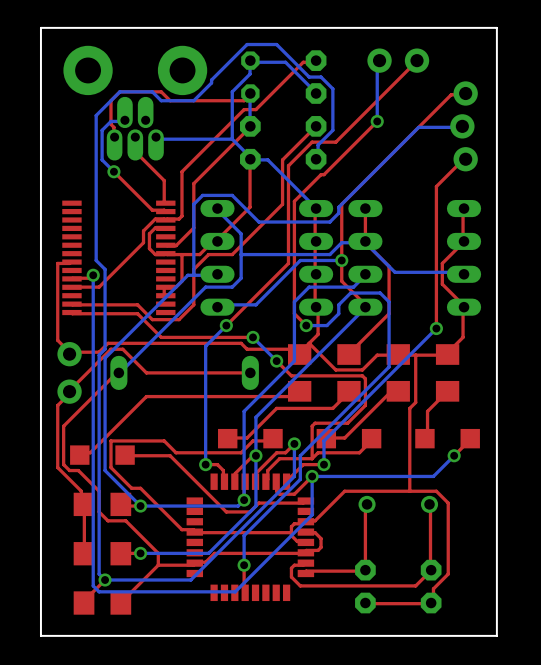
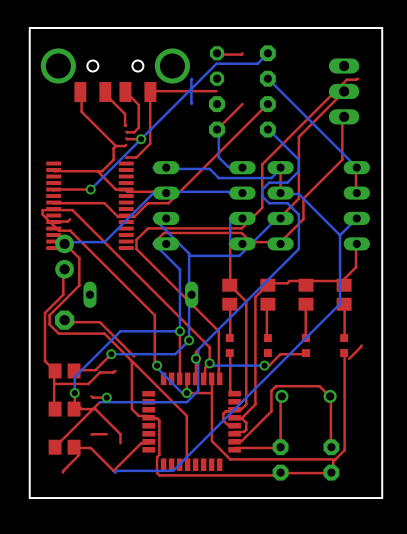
top track: none -> (217, 53) (232, 54)
bottom track: none -> (267, 53) (257, 63) (216, 63) (90, 189)
bottom track: (379, 60) (377, 62) (377, 121) -> none
part: (398, 60) -> none
top track: (417, 60) (335, 142) (312, 142) (288, 165) (288, 263) (226, 325) -> none
top track: (303, 62) (255, 109) -> (216, 91) (195, 91)
part position: (250, 77) -> (217, 66)
part position: (316, 77) -> (267, 66)
part: none -> (115, 75)
top track: (250, 93) (244, 100) (170, 100) (161, 91) (119, 91) (110, 100) (110, 124) (113, 127) (114, 137) -> none
bottom track: (316, 93) (285, 62) (252, 62) (250, 60) (250, 74) (232, 91) (232, 139) -> none
bottom track: none -> (267, 78) (356, 167)
part: (135, 103) -> none
top track: (244, 109) (181, 171) (181, 216) (179, 219) (155, 219) (143, 230) (143, 242) (99, 287) (71, 287) -> (186, 91) (150, 92) (150, 143) (136, 157) (126, 157)
top track: none -> (344, 91) (298, 136) (298, 198) (280, 218)
part: none -> (344, 91)
top track: none -> (80, 92) (81, 111) (115, 146)
top track: none -> (105, 92) (104, 93) (125, 114) (126, 125)
top track: none -> (125, 92) (138, 104) (138, 127) (134, 132) (126, 131)
bottom track: (124, 120) (110, 121) (102, 130) (102, 159) (113, 171) -> none
top track: (377, 121) (294, 201) (294, 313) (306, 325) -> none
via: (377, 121) -> none
top track: (250, 126) (193, 183) (193, 227) (176, 245) (165, 245) -> none
bottom track: (462, 126) (418, 127) (338, 207) (338, 213) (329, 222) -> (280, 167) (271, 178) (253, 178)
part: (464, 126) -> none
top track: (135, 137) (137, 139) (137, 153) (164, 180) (165, 203) -> none
bottom track: (156, 137) (158, 139) (232, 139) -> none
bottom track: (232, 139) (250, 159) (267, 159) (316, 208) -> none
part: (250, 142) -> none
part: none -> (217, 116)
part: (316, 142) -> none
part: none -> (267, 116)
top track: none -> (344, 116) (342, 118) (342, 159) (303, 198) (303, 219) (280, 242) (250, 242) (241, 232) (163, 232) (153, 243)
top track: (250, 159) (250, 207) (217, 239) (217, 242) (211, 242) (199, 254) -> none
top track: (283, 159) (282, 204) (232, 254) (220, 254) -> (267, 104) (168, 203)
bottom track: none -> (217, 129) (218, 130) (218, 157) (229, 167)
bottom track: (316, 159) (318, 156) (318, 145) (332, 130) (332, 88) (321, 77) (309, 77) (276, 44) (247, 44) (193, 100) (161, 100) (152, 91) (119, 91) (96, 115) (96, 260) (105, 269) (105, 349) (99, 355) (99, 479) -> (153, 243) (179, 269) (179, 331) (120, 331) (74, 377)
top track: (465, 159) (436, 186) (436, 328) -> none
top track: none -> (126, 138) (141, 139)
top track: (113, 171) (152, 210) (165, 211) -> none
via: (113, 171) -> none
via: none -> (141, 139)
top track: none -> (126, 144) (115, 146)
top track: none -> (115, 146) (113, 148) (113, 159) (102, 171) (53, 170)
bottom track: (217, 208) (241, 233) (241, 278) (232, 287) (205, 287) (118, 372) -> none
top track: (316, 208) (315, 304) (318, 307) (318, 334) (299, 354) (294, 349) (247, 349) (241, 343) (108, 343) (99, 352) (69, 352) -> none
top track: none -> (97, 171) (115, 189) (153, 193)
bottom track: (285, 222) (258, 222) (232, 195) (202, 195) (193, 204) (193, 275) -> (218, 178) (209, 168) (153, 167)
top track: (165, 228) (155, 227) (149, 233) (149, 248) (155, 254) (193, 254) -> (53, 203) (104, 203) (118, 216) (134, 216) (147, 203)
top track: none -> (90, 189) (53, 190)
via: none -> (90, 189)
bottom track: none -> (229, 193) (154, 191) (104, 242) (65, 242) (64, 243)
top track: (365, 241) (389, 266) (389, 313) (348, 354) -> none
top track: (464, 241) (442, 263) (442, 284) (464, 307) -> none
bottom track: none -> (280, 194) (298, 194) (340, 235)
top track: (181, 254) (181, 281) (176, 287) (164, 287) (164, 295) (165, 295) -> none
top track: (208, 254) (193, 269) (193, 304) (179, 319) (152, 319) -> (159, 203) (152, 203)
bottom track: (241, 254) (329, 254) (341, 242) (365, 242) (394, 272) (463, 272) (464, 274) -> (340, 235) (356, 218)
top track: (341, 260) (341, 281) (365, 304) -> (262, 207) (241, 228) (147, 228) (136, 239) (136, 248) (218, 331) (219, 378)
bottom track: (341, 260) (300, 260) (255, 304) (217, 304) (217, 307) -> none
via: (341, 260) -> none
top track: (57, 269) (57, 340) (69, 352) -> (42, 214) (58, 230) (70, 230) (154, 315) (154, 365)
bottom track: none -> (153, 218) (189, 253) (189, 340) (175, 354) (111, 354)
bottom track: (217, 274) (187, 275) (105, 358) (105, 470) (140, 506) (238, 506) (244, 500) (244, 411) (294, 361) (294, 301) (309, 287) (353, 287) (365, 275) -> (189, 255) (239, 255) (276, 219) (280, 219)
bottom track: none -> (229, 218) (229, 243)
bottom track: (93, 275) (93, 585) (99, 591) (235, 591) -> (115, 472) (115, 470) (173, 470) (179, 463)
via: (93, 275) -> none
bottom track: (389, 301) (380, 293) (350, 293) (338, 304) (338, 313) (326, 325) (306, 325) -> (298, 239) (298, 214) (287, 203) (269, 203) (262, 196) (262, 189) (269, 182) (287, 182) (298, 171) (298, 159) (267, 129)
top track: (71, 304) (137, 304) -> (53, 209) (72, 210) (104, 242)
top track: none -> (229, 243) (229, 285) (246, 301) (246, 404)
bottom track: (365, 307) (255, 417) (255, 506) (208, 553) (140, 553) -> none
top track: (71, 312) (137, 313) (161, 337) (252, 337) -> none
bottom track: (389, 313) (389, 366) (300, 455) (300, 479) (244, 535) (244, 565) -> (298, 248) (198, 349) (198, 390) (186, 402) (99, 402)
part: none -> (64, 256)
bottom track: (226, 325) (205, 346) (205, 464) -> none
via: (226, 325) -> none
via: (306, 325) -> none
bottom track: (436, 328) (323, 440) (323, 464) -> none
via: (436, 328) -> none
bottom track: (252, 337) (276, 361) -> none
via: (252, 337) -> none
top track: none -> (64, 269) (63, 294) (45, 313) (45, 361) (55, 370) (55, 409)
top track: (309, 343) (335, 369) (362, 369) (374, 358) -> (241, 418) (255, 404) (255, 297) (269, 283) (287, 283)
part footprint: [288, 344, 312, 402] -> [222, 278, 238, 311]
part footprint: [337, 344, 361, 402] -> [260, 278, 276, 311]
part footprint: [386, 344, 410, 402] -> [298, 278, 314, 311]
part footprint: [435, 344, 460, 402] -> [336, 278, 352, 311]
top track: (415, 355) (415, 402) (409, 408) (409, 491) -> none
top track: (276, 361) (291, 375) (362, 375) (365, 378) (365, 405) (347, 423) (315, 423) (312, 426) (312, 458) -> none
via: (276, 361) -> none
part: (69, 372) -> none
top track: (118, 372) (63, 426) (63, 464) (69, 470) (78, 470) (99, 491) (99, 500) -> none
top track: (250, 372) (146, 372) (122, 349) (110, 349) (69, 390) (69, 393) (57, 405) (57, 467) (81, 491) (81, 503) (84, 506) (84, 553) -> none
top track: none -> (229, 304) (229, 338)
top track: none -> (267, 304) (267, 338)
top track: none -> (305, 304) (305, 338)
top track: none -> (344, 304) (344, 338)
top track: (299, 391) (294, 396) (146, 396) (90, 452) (81, 452) (79, 455) -> none
top track: (348, 391) (332, 408) (276, 408) (247, 437) (227, 438) -> none
top track: (398, 391) (397, 393) (389, 393) (344, 437) (326, 438) -> none
top track: (447, 391) (427, 411) (427, 437) (424, 438) -> none
top track: none -> (64, 320) (65, 322) (99, 322) (125, 347)
part: none -> (64, 320)
via: none -> (179, 331)
part footprint: [316, 428, 382, 449] -> [263, 334, 272, 358]
part footprint: [415, 428, 480, 449] -> [340, 334, 349, 358]
via: none -> (189, 340)
part: (250, 438) -> none
top track: (273, 438) (270, 440) (252, 440) (241, 452) (176, 452) -> none
part: none -> (229, 345)
top track: (371, 438) (359, 452) (318, 452) (312, 458) -> none
part: none -> (305, 345)
top track: (164, 440) (110, 440) (110, 467) (131, 488) (140, 488) (173, 520) -> (131, 361) (131, 409)
top track: (294, 443) (285, 452) (276, 452) (255, 473) -> (198, 349) (195, 351) (195, 372)
bottom track: (294, 443) (294, 476) (190, 580) (105, 580) (99, 574) (99, 500) -> none
via: (294, 443) -> none
top track: none -> (229, 353) (230, 390) (234, 393)
top track: none -> (305, 353) (280, 354) (269, 365) (264, 365)
top track: none -> (344, 353) (344, 395)
top track: none -> (111, 354) (95, 370) (74, 370)
via: none -> (111, 354)
part: (102, 455) -> none
top track: (125, 455) (170, 455) -> (64, 243) (79, 258) (79, 285) (49, 315) (49, 324) (58, 333) (104, 333) (129, 358)
top track: (255, 455) (252, 455) (235, 473) -> (179, 331) (179, 372)
bottom track: (454, 455) (433, 476) (312, 476) (312, 514) -> (340, 235) (340, 303) (239, 404)
via: (454, 455) -> none
top track: (312, 458) (279, 458) (267, 470) -> (115, 253) (209, 347) (209, 363) (205, 370)
bottom track: none -> (209, 363) (211, 365) (264, 365)
via: none -> (209, 363)
bottom track: none -> (154, 365) (182, 393)
top track: (205, 464) (217, 464) (223, 470) (224, 481) -> none
top track: (323, 464) (303, 464) (286, 481) -> none
via: (323, 464) -> none
via: none -> (264, 365)
part: none -> (64, 370)
top track: none -> (115, 370) (99, 372) (88, 383) (54, 383)
top track: (312, 476) (294, 494) (279, 494) (276, 491) -> none
via: (312, 476) -> none
top track: (359, 491) (344, 491) (321, 514) -> (276, 386) (271, 390) (271, 411) (241, 441) (234, 441)
top track: (415, 491) (436, 491) (448, 503) -> (319, 386) (330, 396)
via: none -> (74, 393)
top track: none -> (211, 393) (182, 393)
top track: (305, 501) (303, 503) (258, 503) (250, 511) (226, 511) -> (186, 443) (186, 415) (173, 402)
part: (102, 504) -> none
top track: none -> (99, 402) (55, 447)
part: none -> (64, 409)
top track: (291, 532) (205, 532) -> (280, 473) (278, 475) (159, 475) (157, 473) (159, 420) (157, 418)
top track: (305, 552) (214, 553) (205, 562) (194, 563) -> none
part: (102, 553) -> none
via: (140, 553) -> none
top track: (305, 563) (303, 565) (294, 565) (291, 568) (291, 577) -> (211, 386) (211, 441) (223, 452)
top track: (184, 565) (158, 565) (120, 603) -> (141, 443) (113, 470)
via: (244, 565) -> none
part: none -> (64, 447)
top track: none -> (74, 447) (90, 447) (115, 472)
top track: (431, 570) (415, 585) -> (335, 459) (319, 459)
via: (105, 580) -> none
part: (102, 603) -> none

